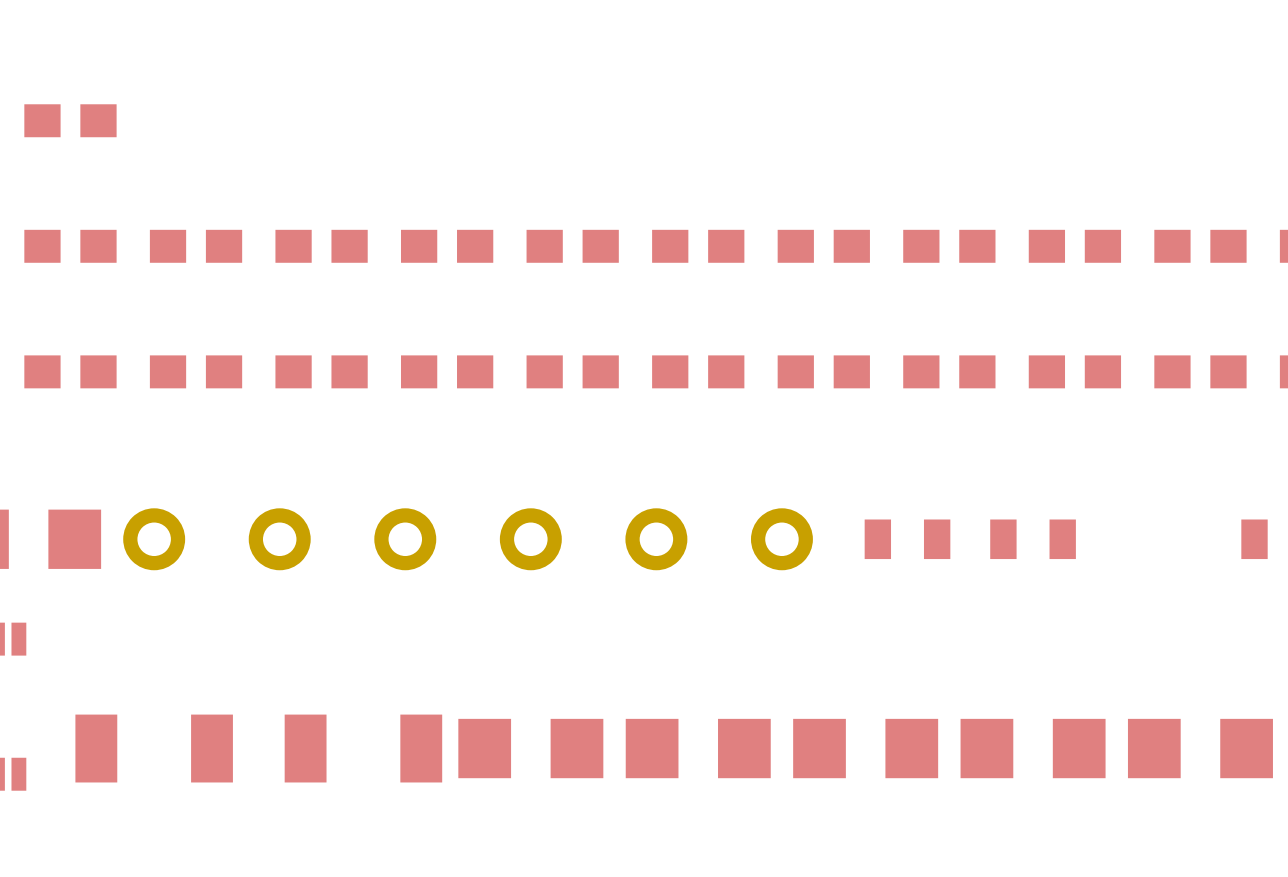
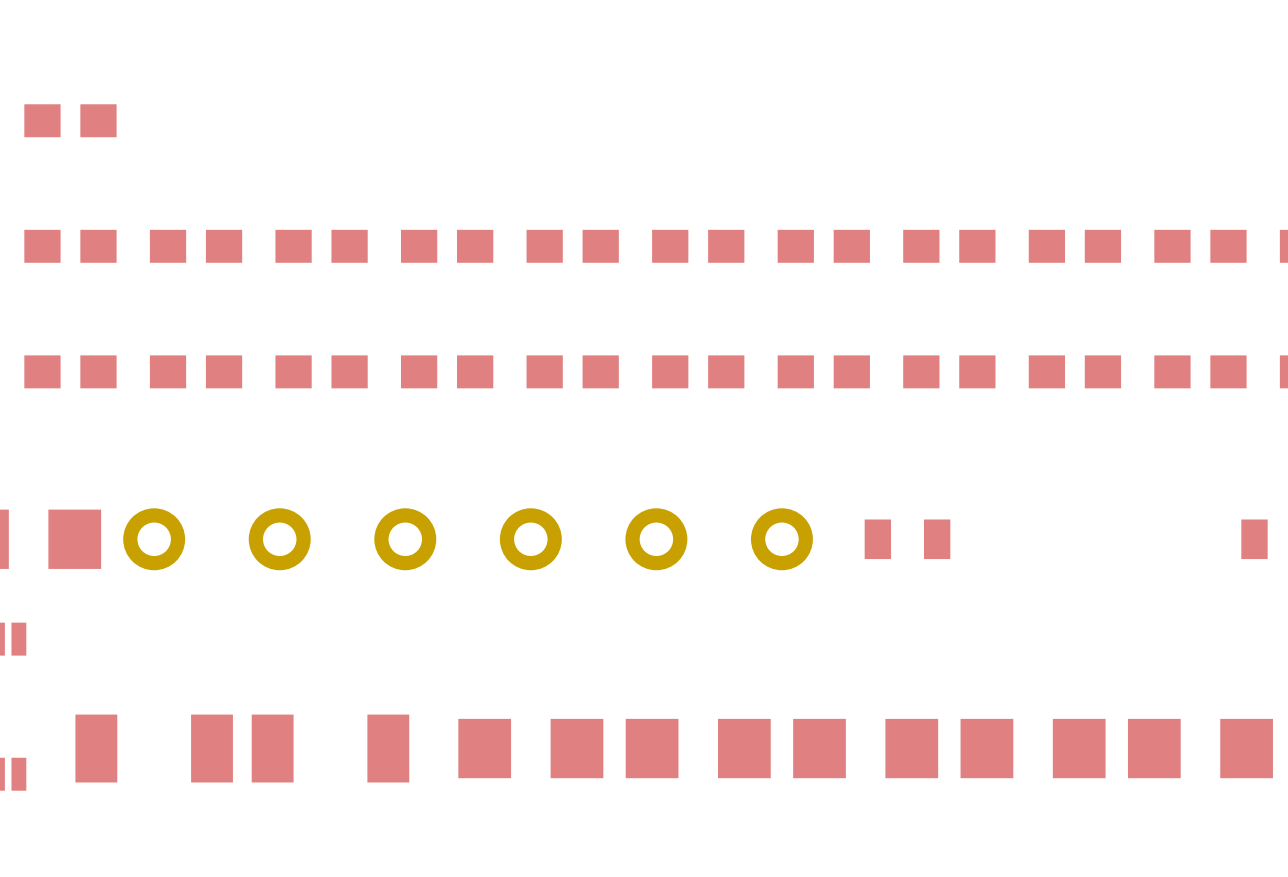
part: (1033, 539) -> none
part position: (363, 748) -> (330, 748)

